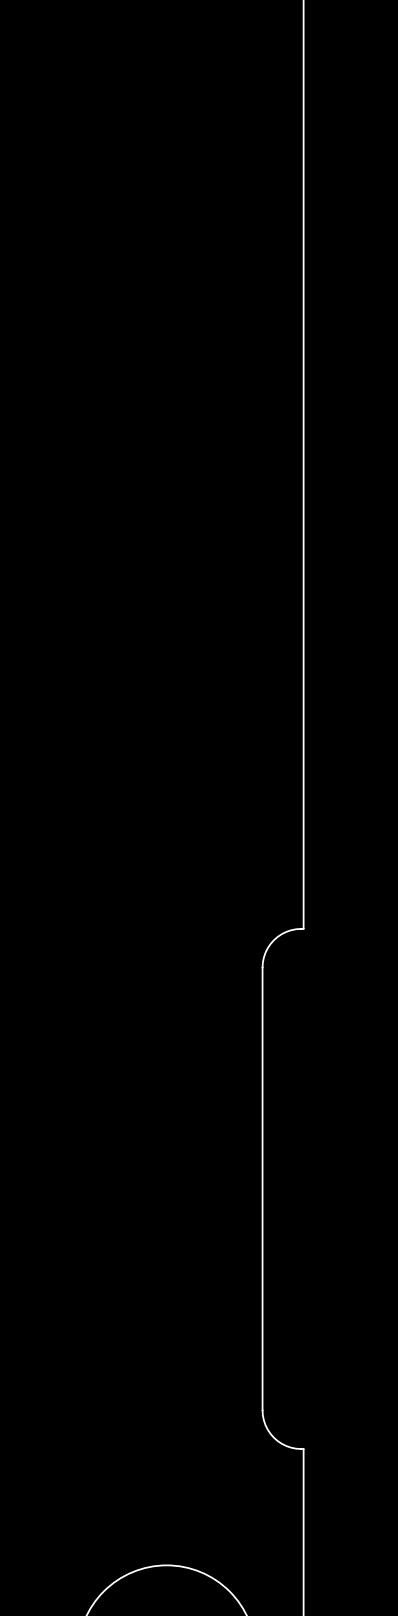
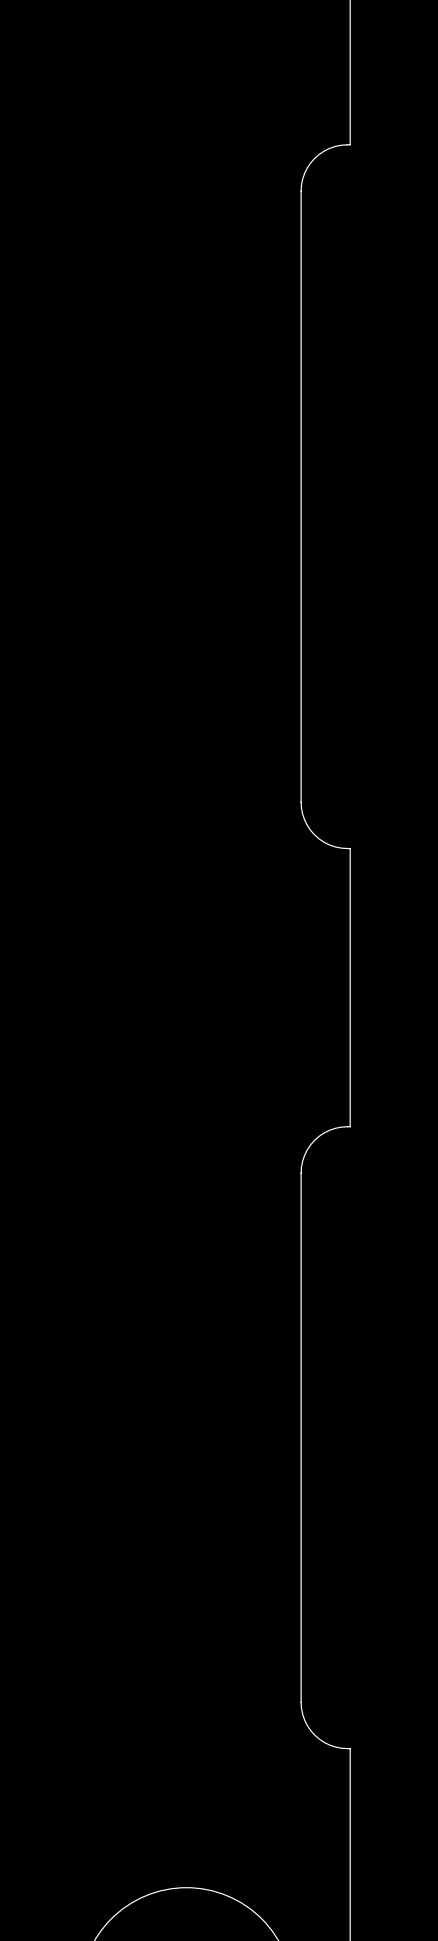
board edge: (303, 107) (303, 696) -> (350, 144) (329, 148) (314, 158) (304, 173) (301, 191) (301, 808) (307, 825) (319, 838) (335, 846) (350, 848)

